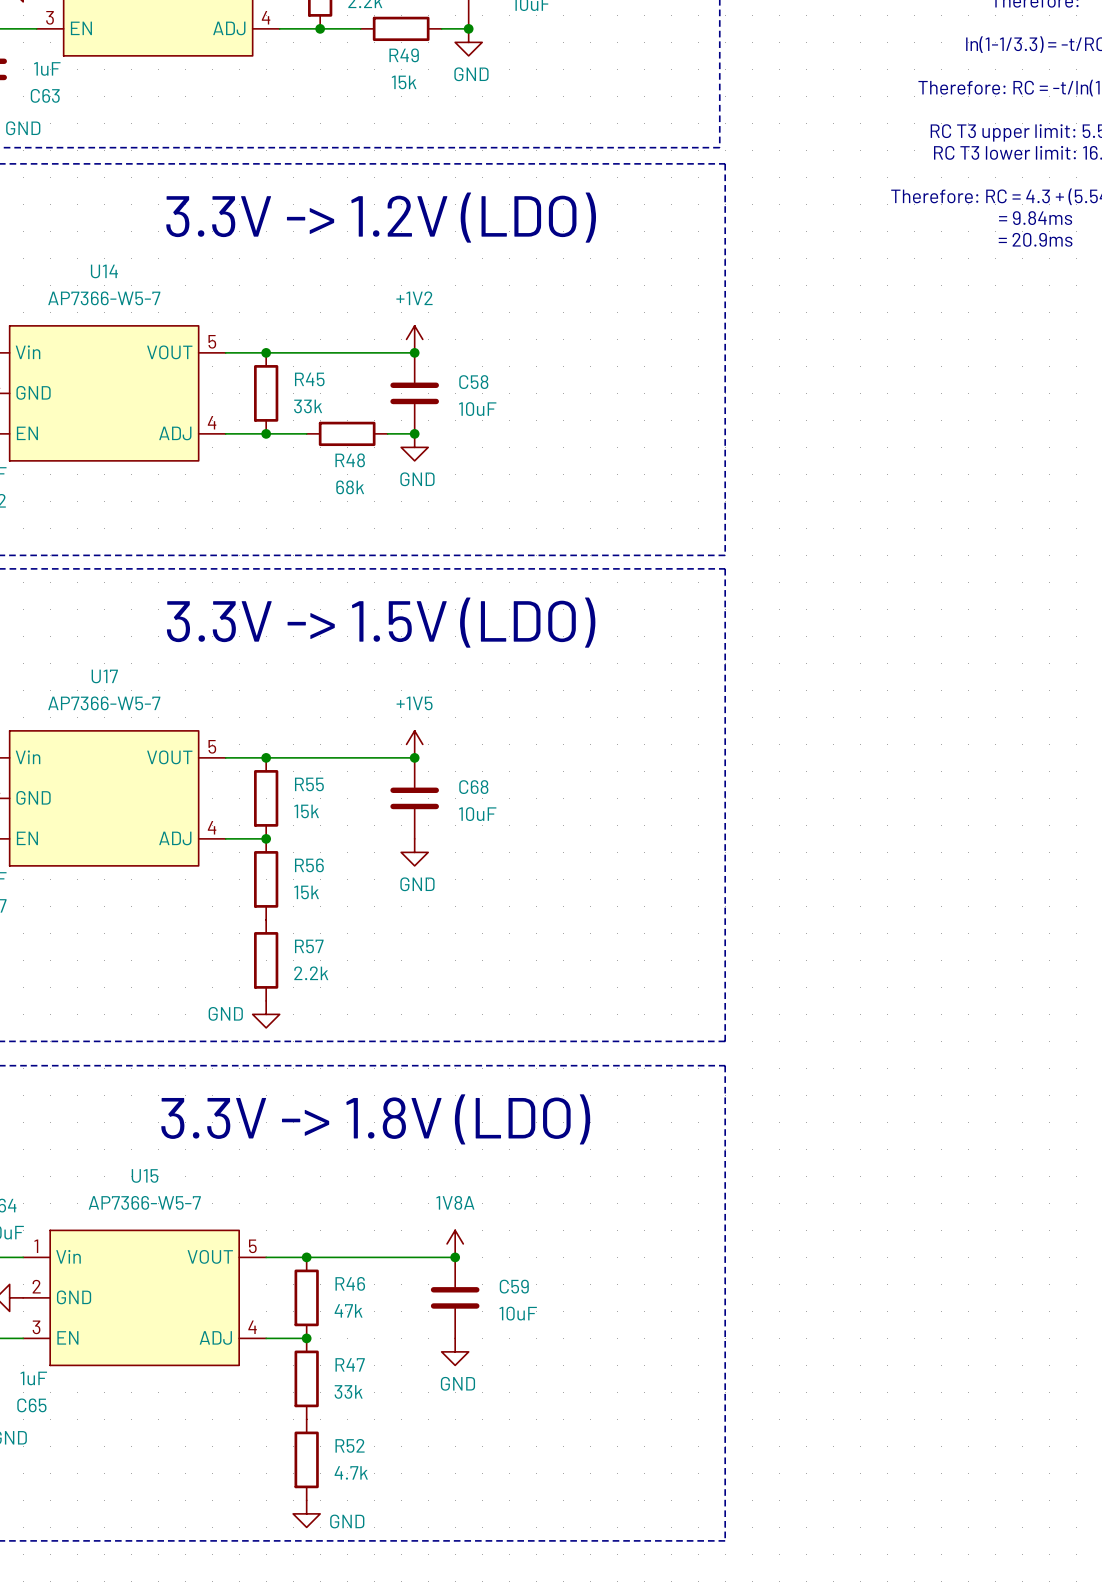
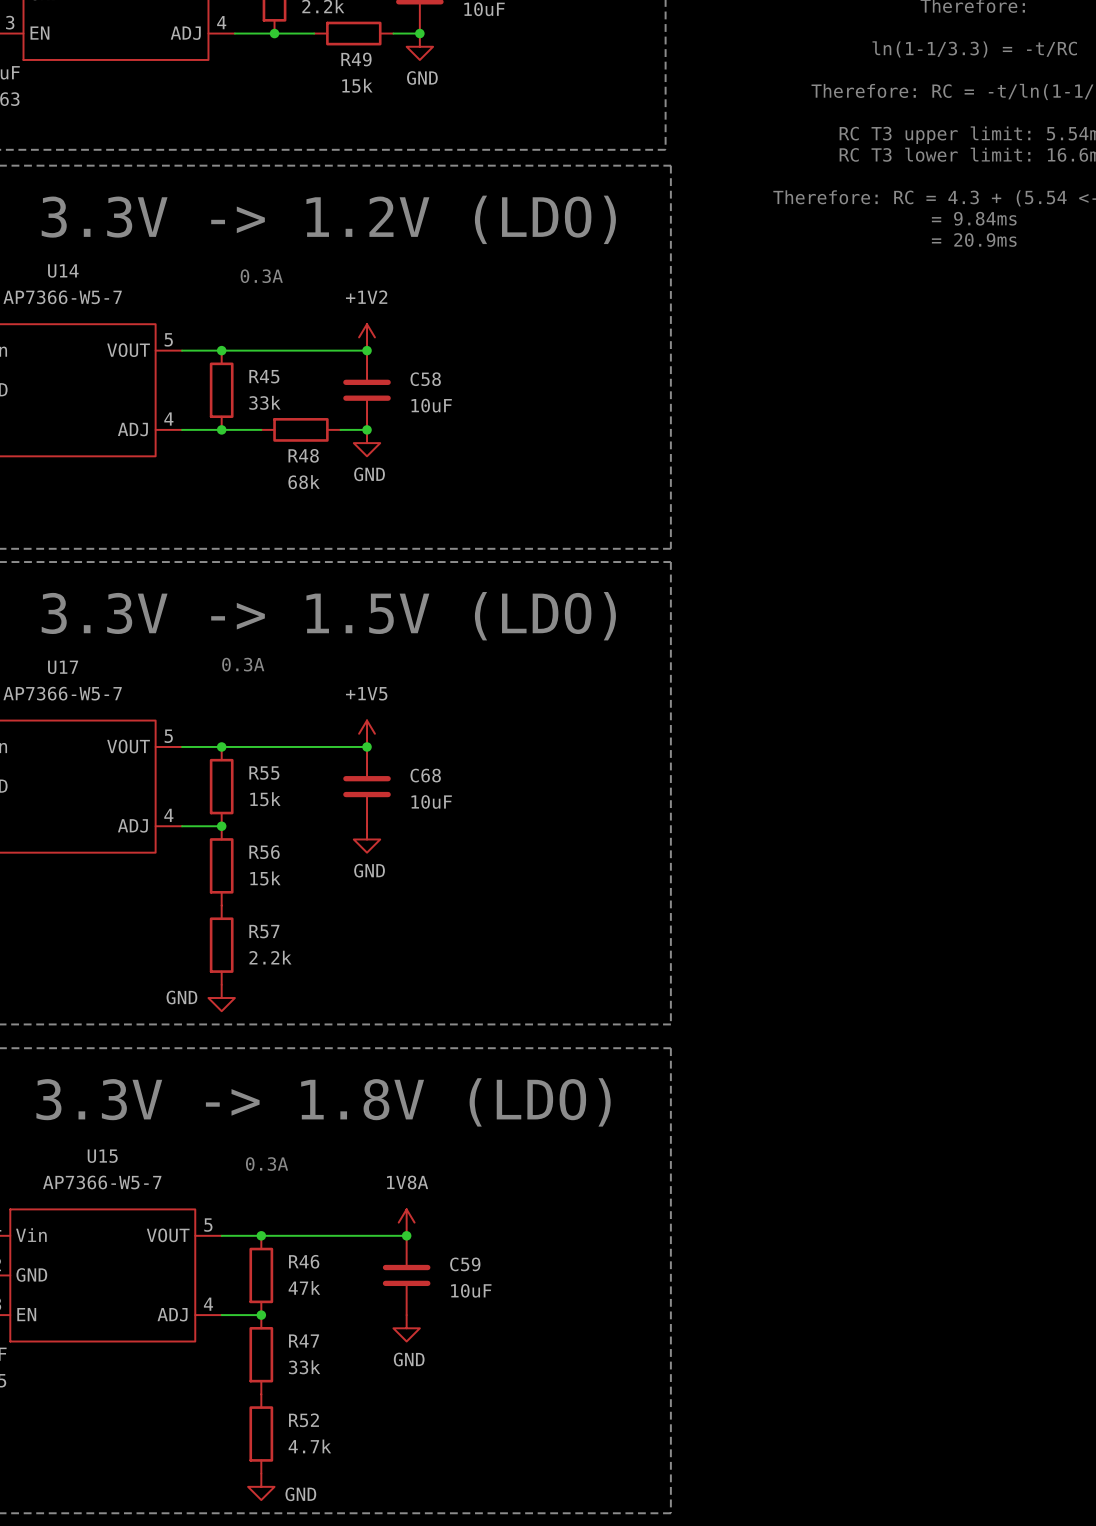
text: none -> 0.3A (261, 276)
text: none -> 0.3A (243, 664)
text: none -> 0.3A (267, 1164)

